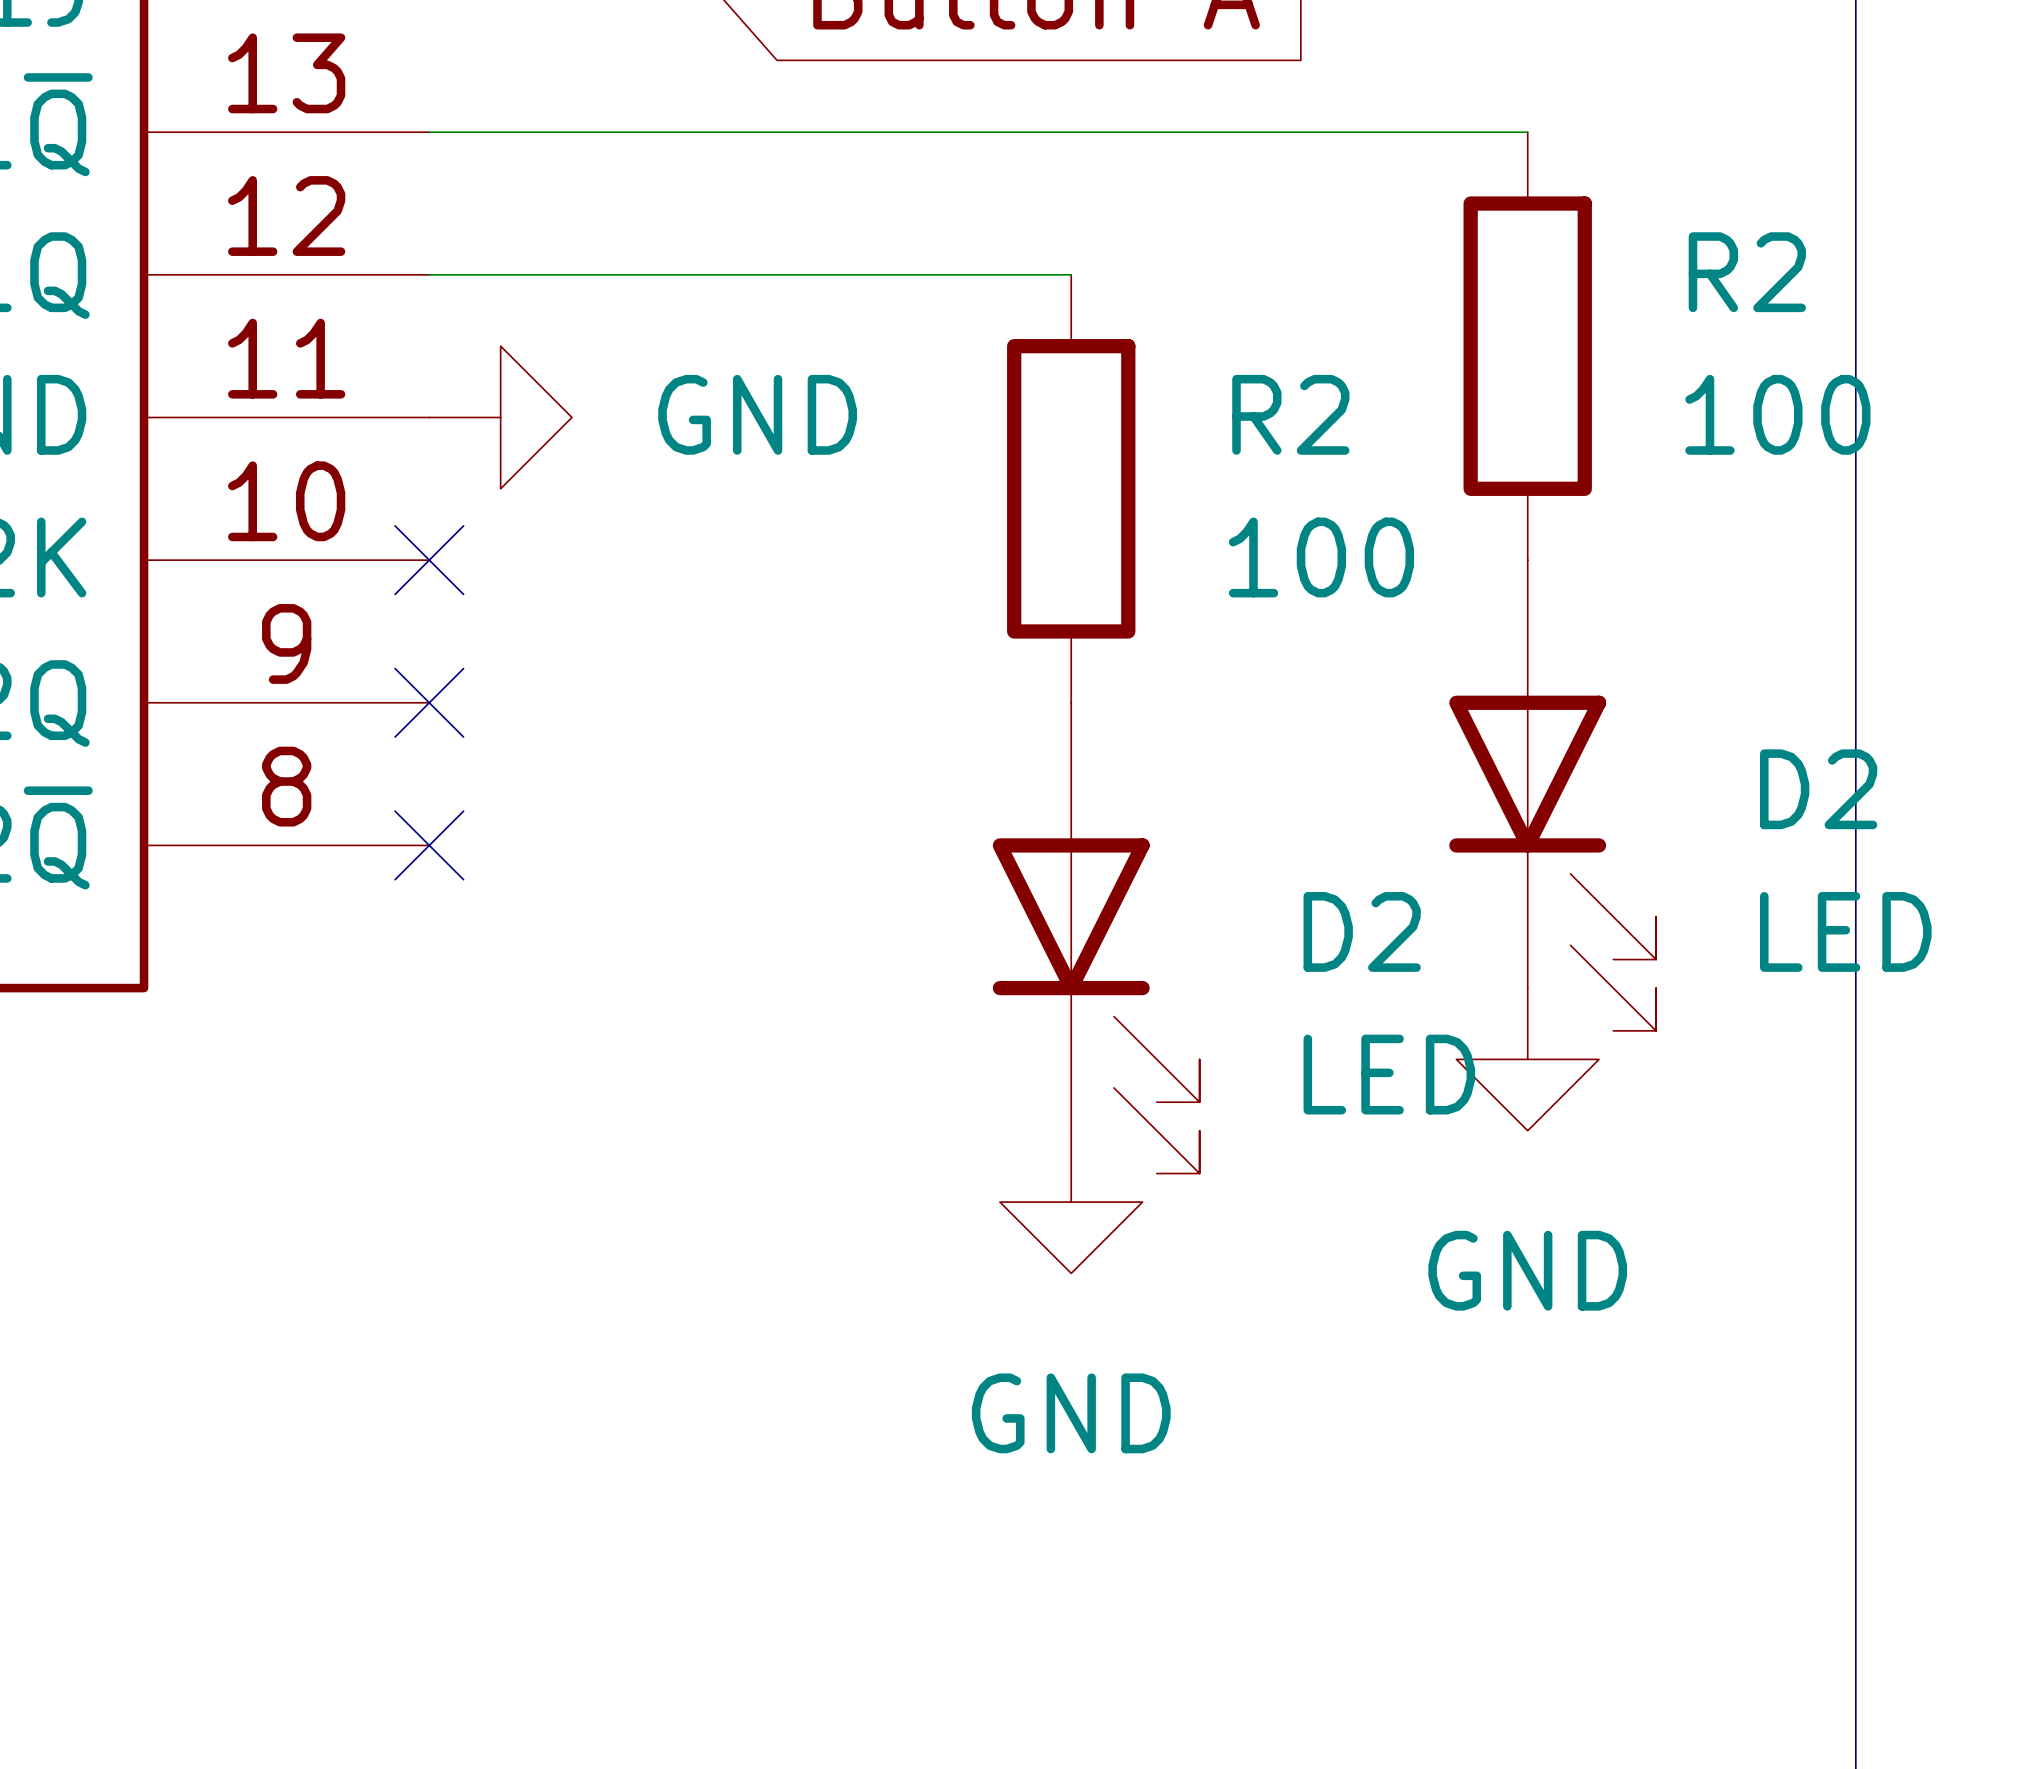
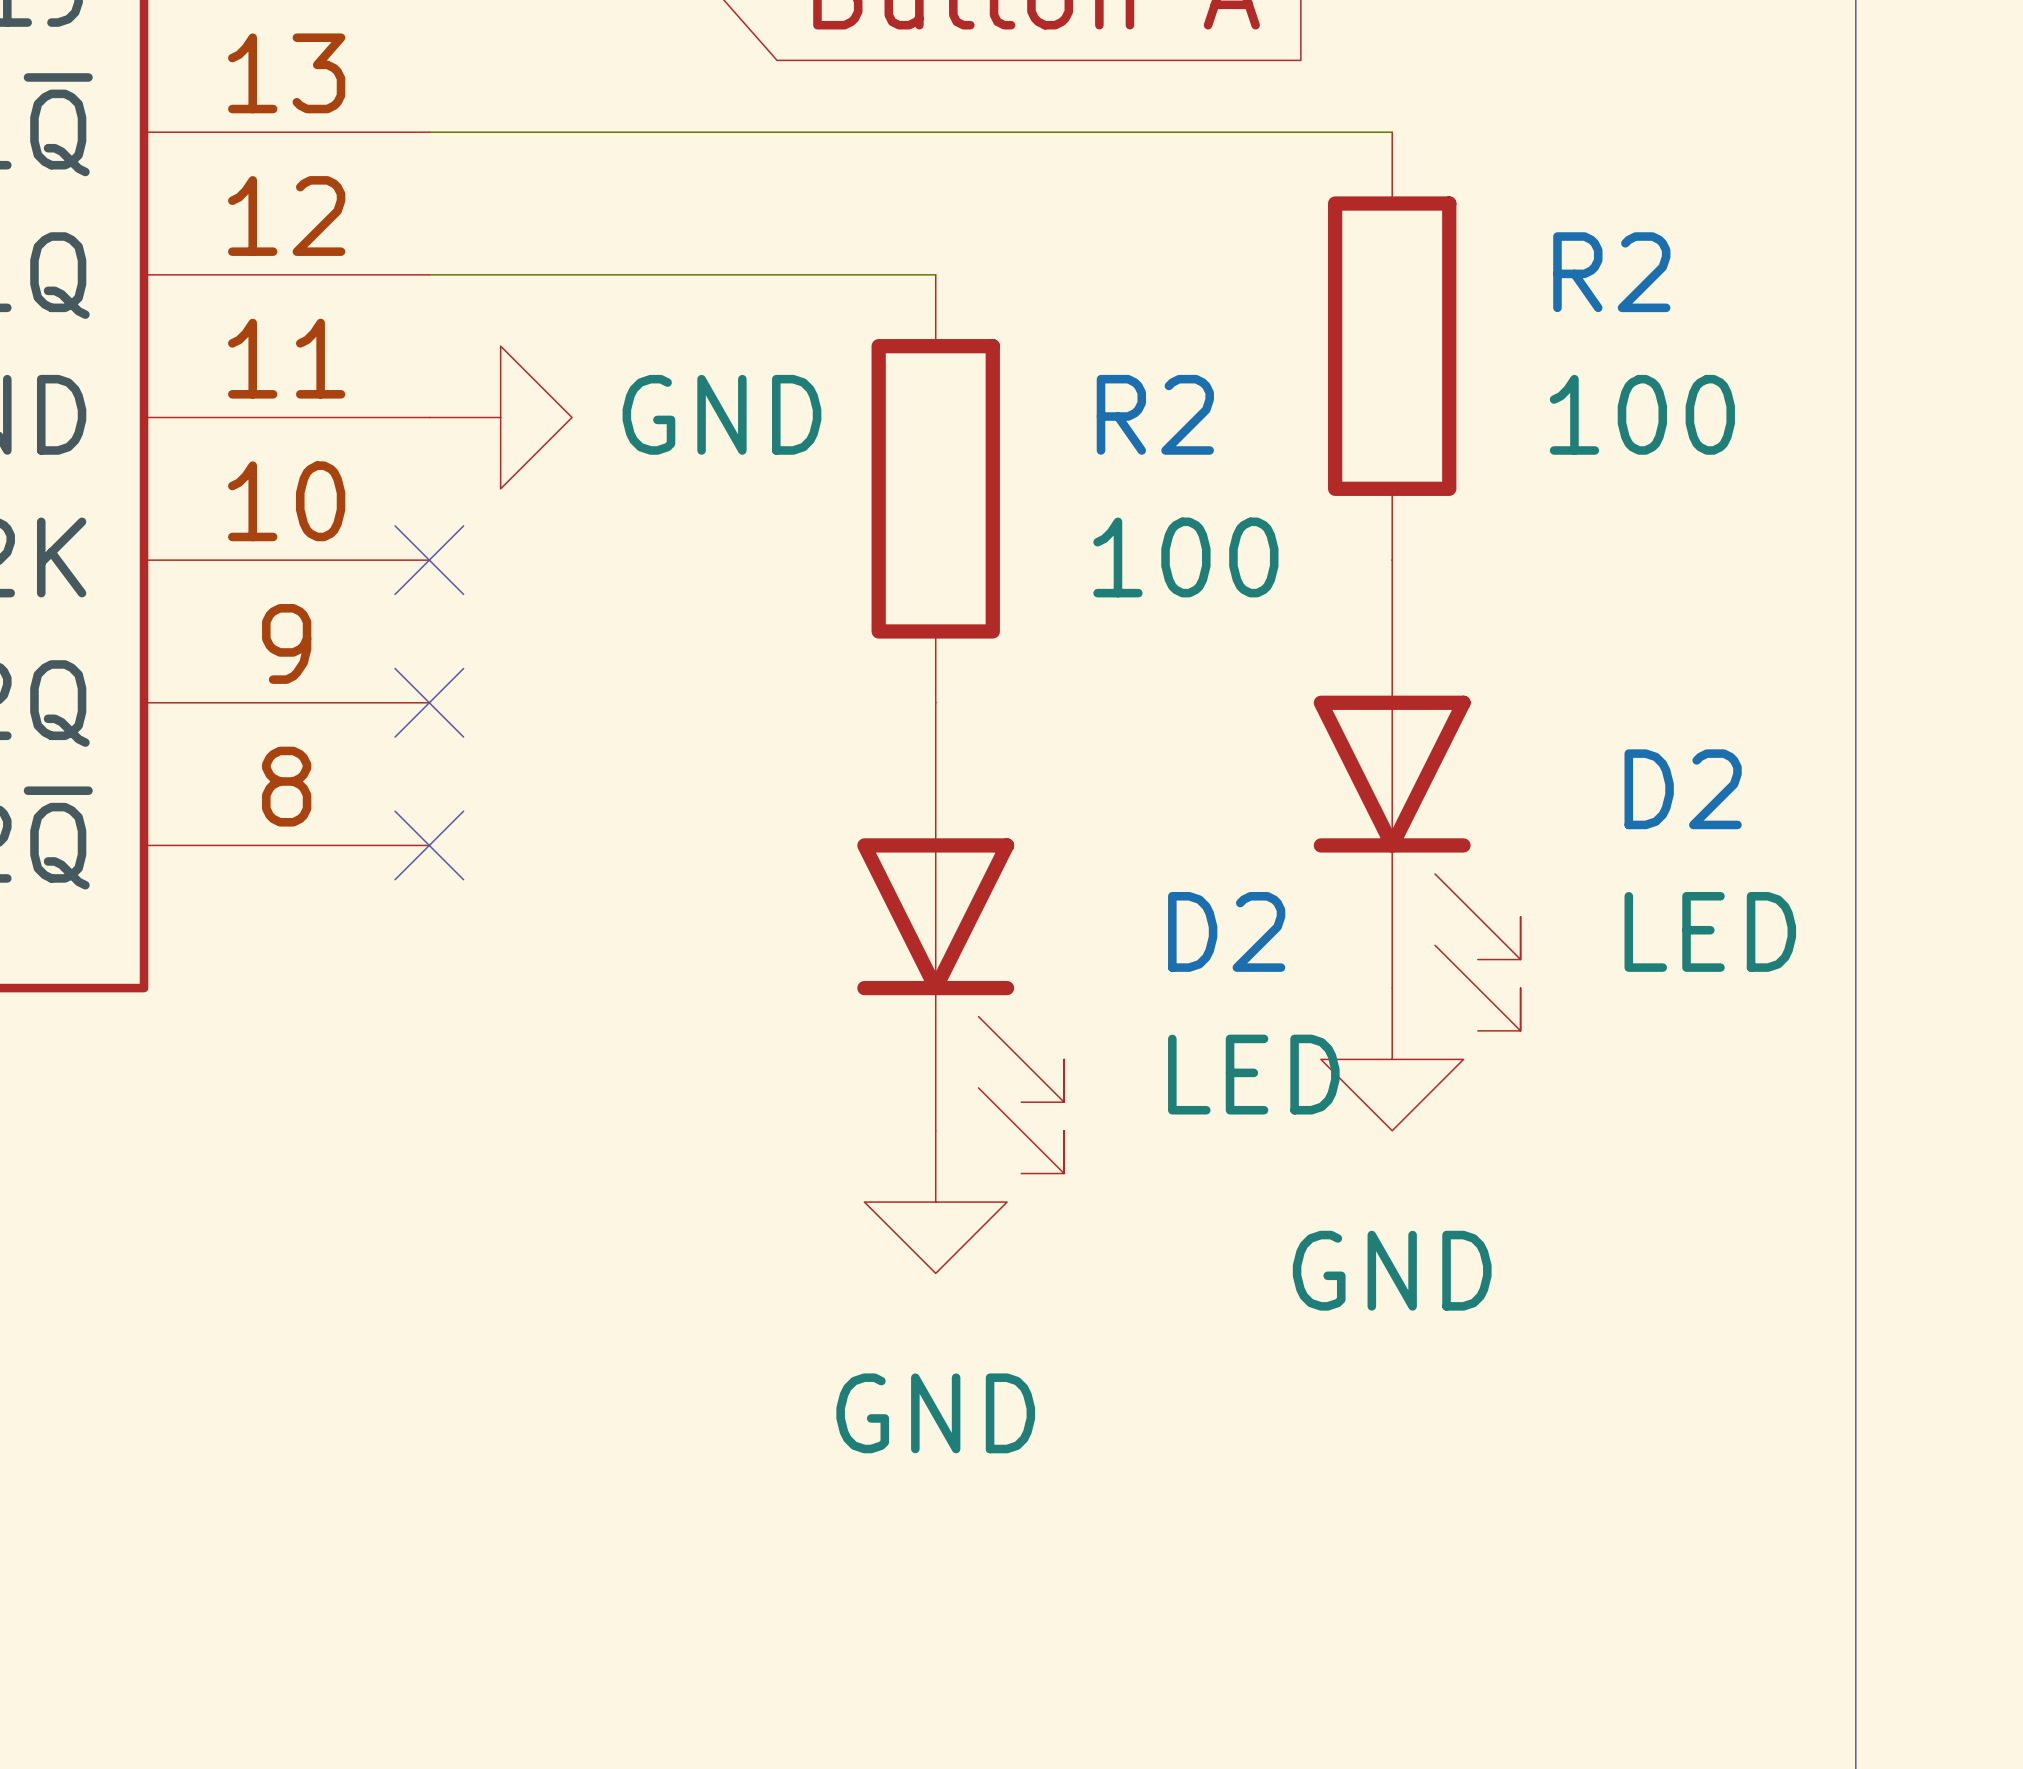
wire: (1392, 132) (1527, 132) -> none
wire: (935, 274) (1071, 274) -> none
R2 position: (1527, 346) -> (1392, 346)
power symbol text position: GND (757, 414) -> GND (721, 414)
R2 position: (1071, 488) -> (935, 488)
D2 position: (1552, 795) -> (1417, 795)
D2 position: (1096, 938) -> (960, 938)
power symbol position: GND (1527, 1059) -> GND (1392, 1059)
power symbol position: GND (1071, 1202) -> GND (935, 1202)

